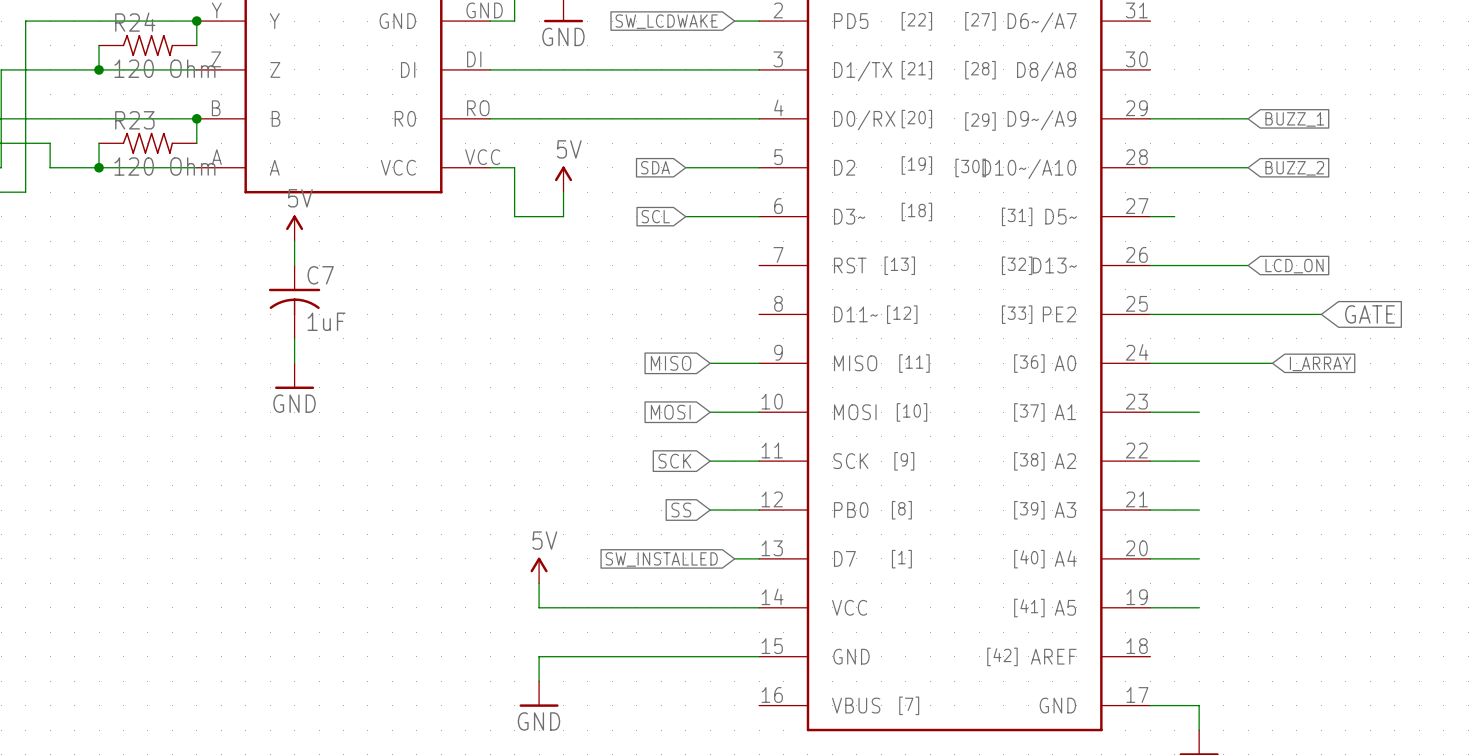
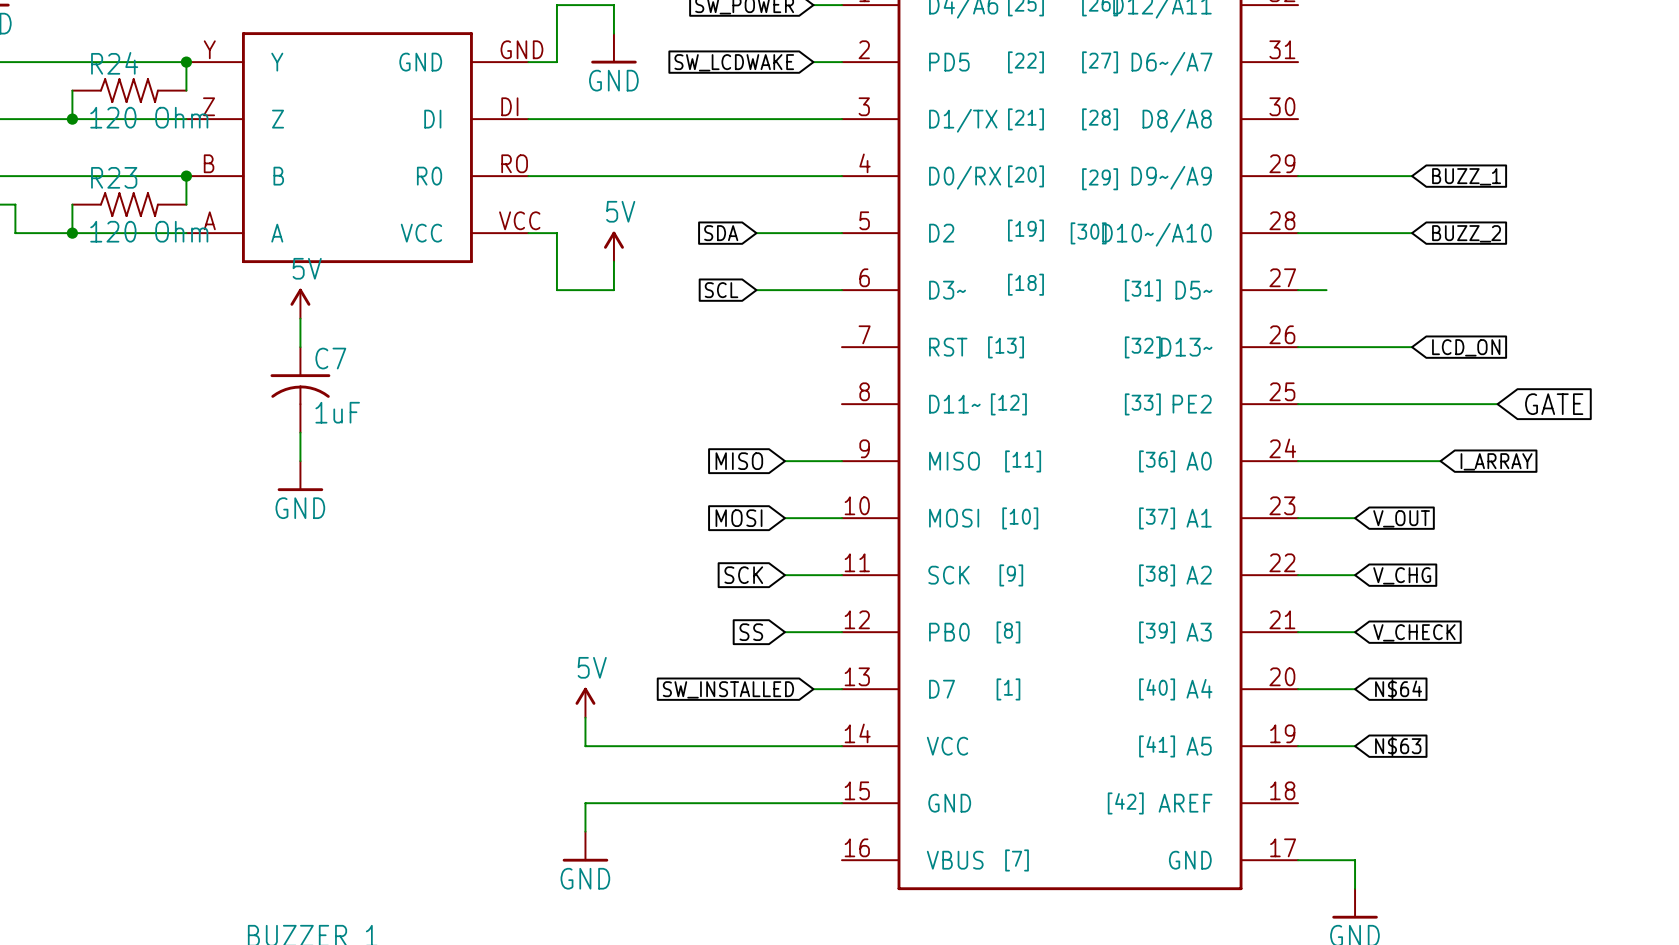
global label: none -> V_OUT (1401, 518)
global label: none -> V_CHG (1402, 575)
global label: none -> V_CHECK (1414, 632)
global label: none -> N$64 (1398, 689)
global label: none -> N$63 (1398, 746)

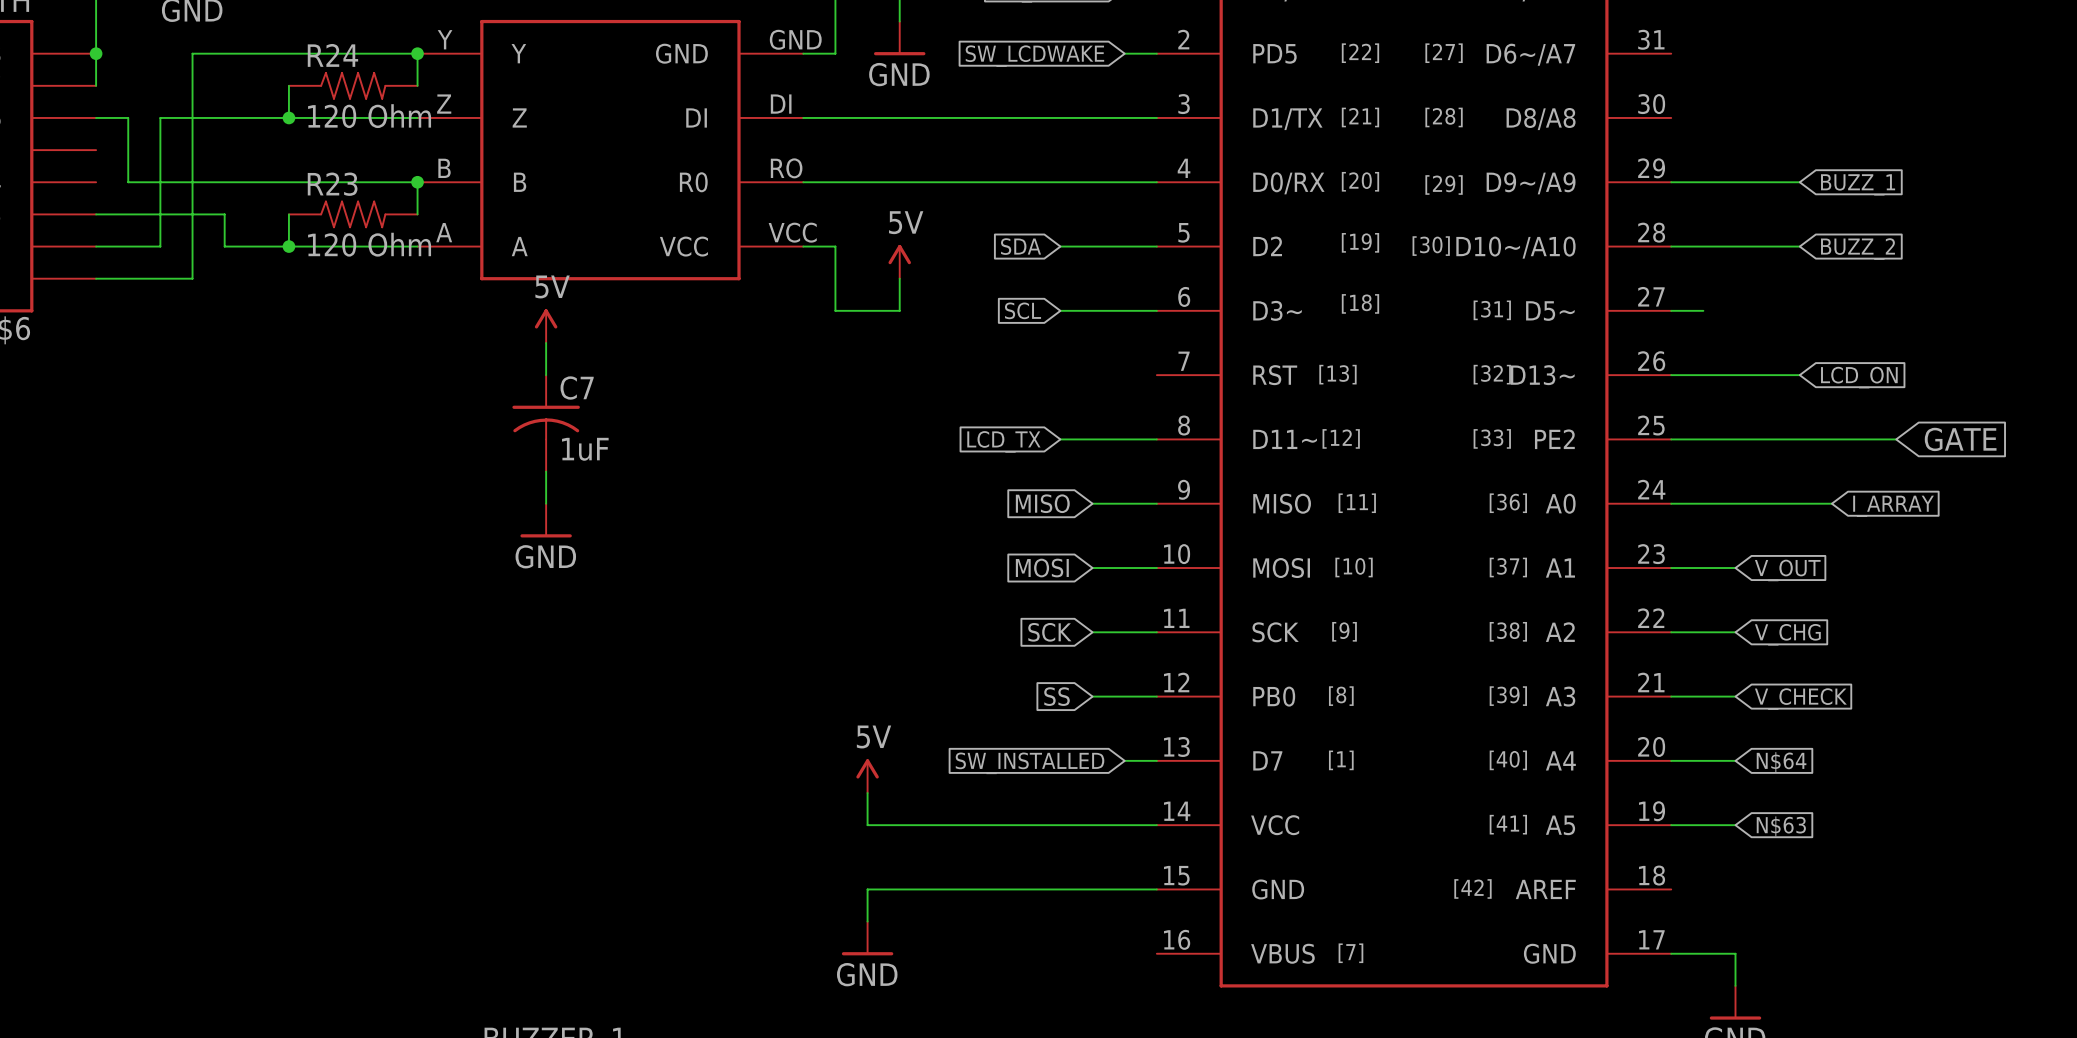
global label: none -> LCD_TX (1003, 441)
wire: none -> (1060, 439) (1156, 439)

